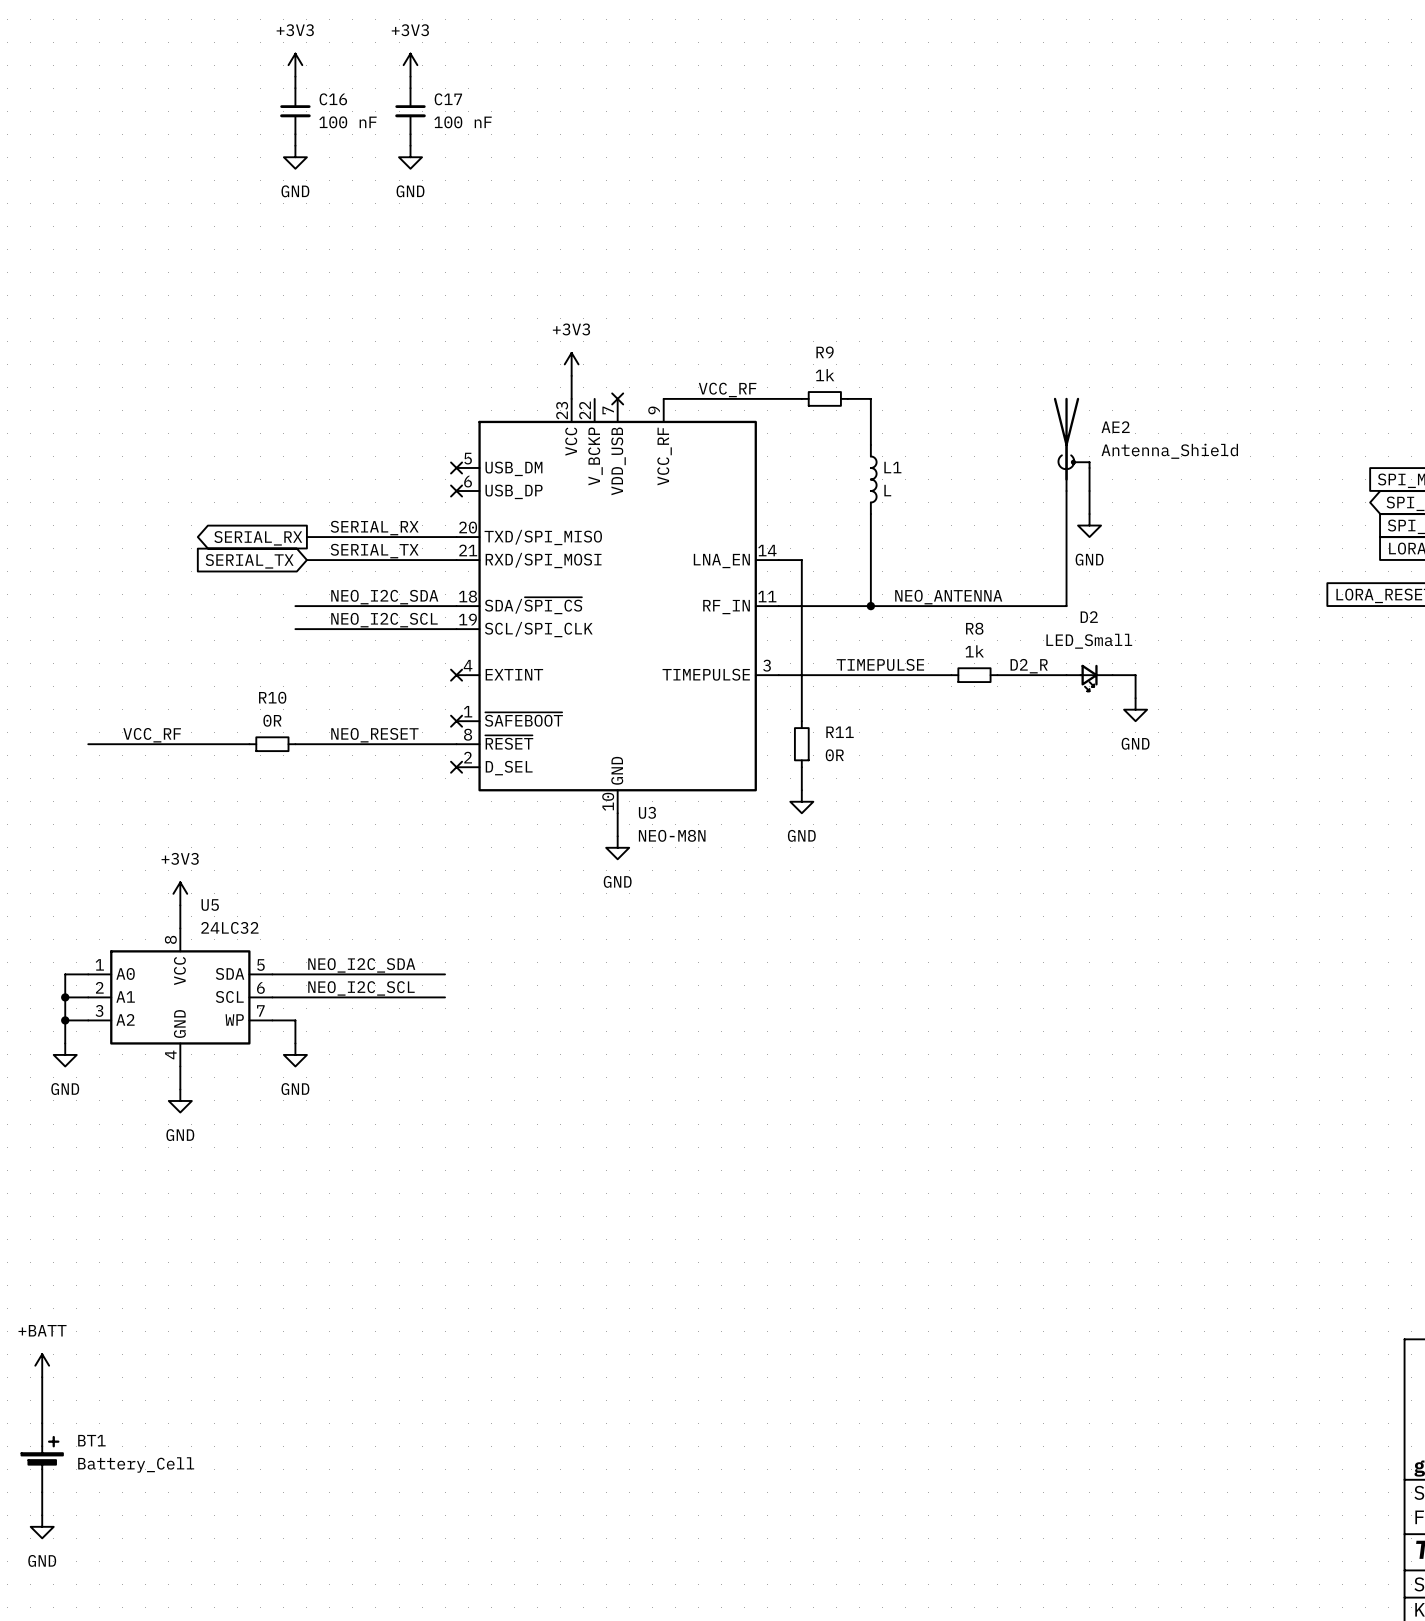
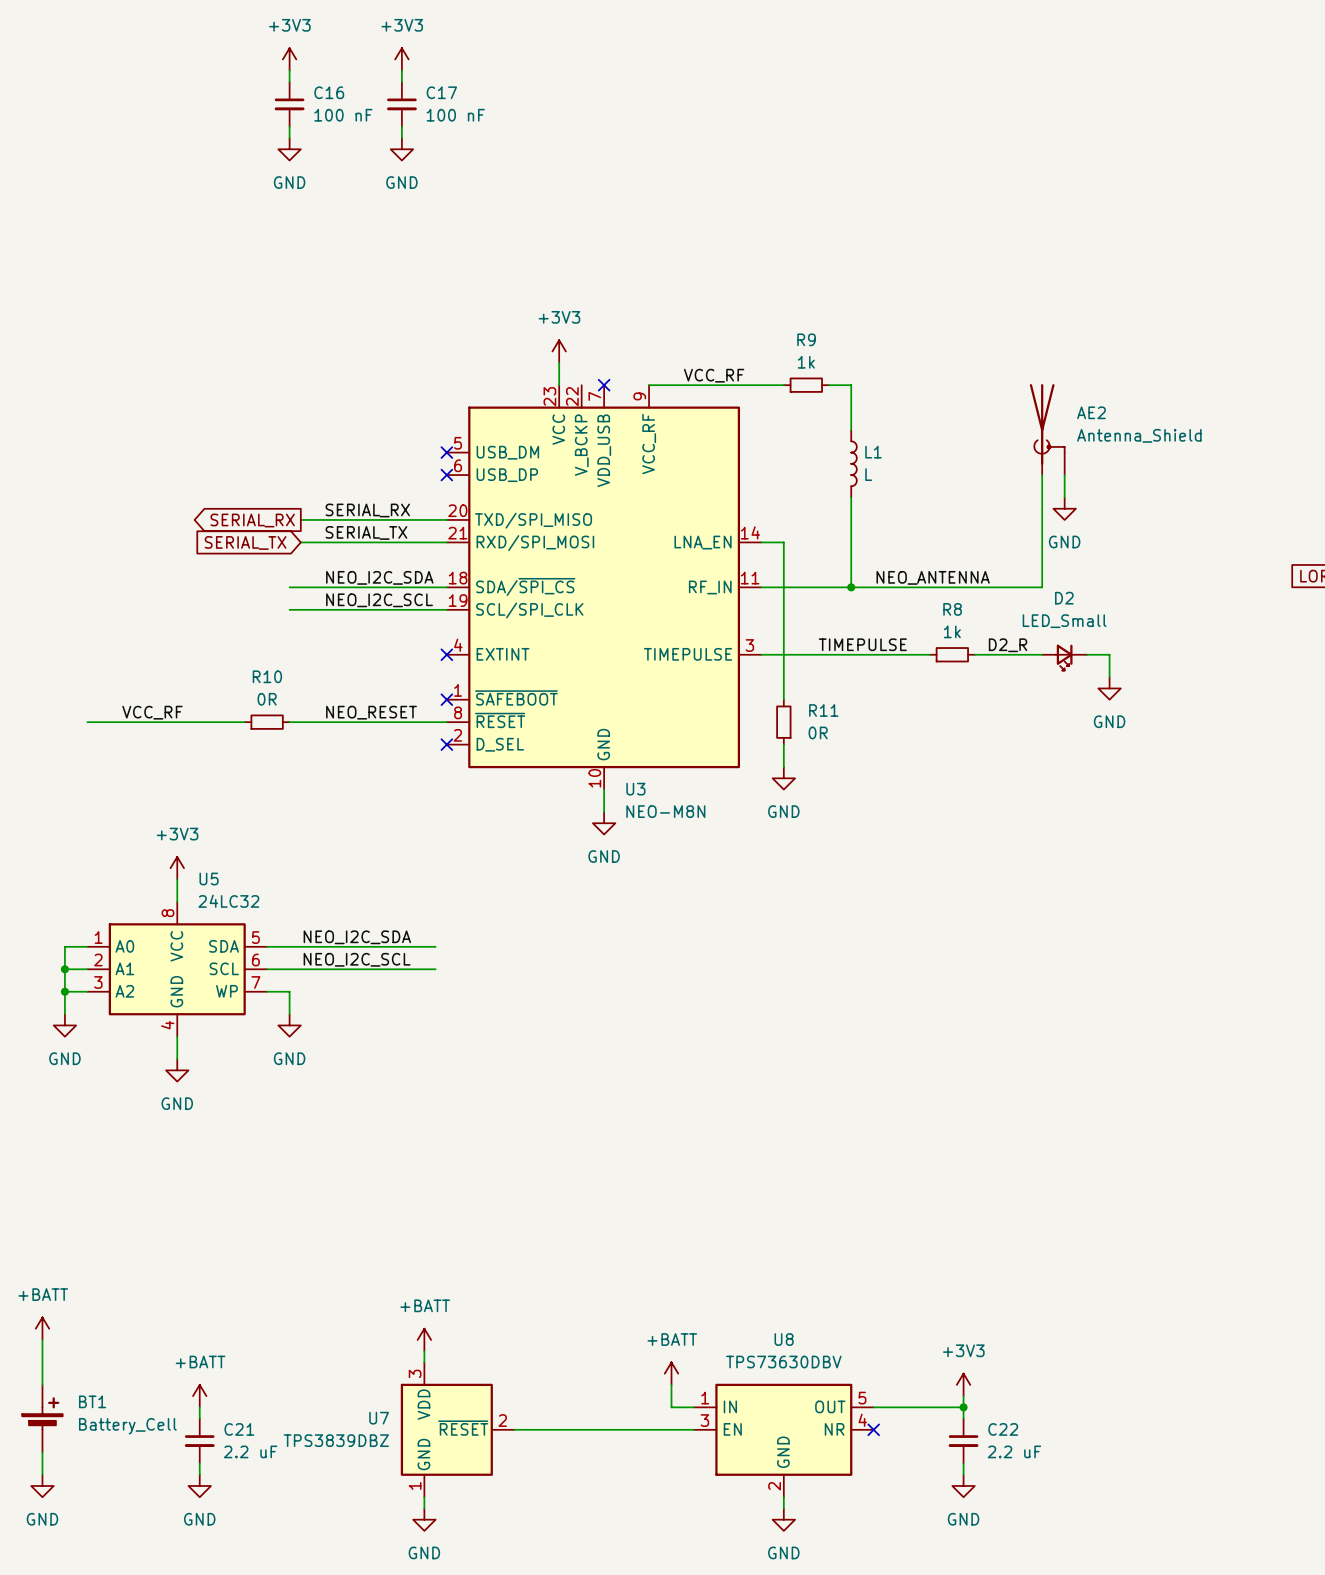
power symbol: none -> +BATT (424, 1339)
wire: none -> (424, 1351) (424, 1362)
power symbol: none -> +BATT (671, 1373)
wire: none -> (671, 1384) (671, 1407) (693, 1407)
power symbol: none -> +3V3 (963, 1384)
power symbol: none -> +BATT (199, 1396)
wire: none -> (963, 1396) (963, 1418)
wire: none -> (199, 1407) (199, 1418)
wire: none -> (873, 1407) (963, 1407)
junction: none -> (963, 1407)
U7: none -> TPS3839DBZ (457, 1429)
wire: none -> (514, 1429) (693, 1429)
no-connect mark: none -> (873, 1429)
C21: none -> 2.2 uF (199, 1441)
U8: none -> TPS73630DBV (783, 1440)
C22: none -> 2.2 uF (963, 1441)
wire: none -> (199, 1463) (199, 1474)
wire: none -> (963, 1463) (963, 1474)
power symbol: none -> GND (199, 1485)
power symbol: none -> GND (963, 1485)
wire: none -> (424, 1497) (424, 1508)
wire: none -> (783, 1497) (783, 1508)
power symbol: none -> GND (424, 1519)
power symbol: none -> GND (783, 1519)

